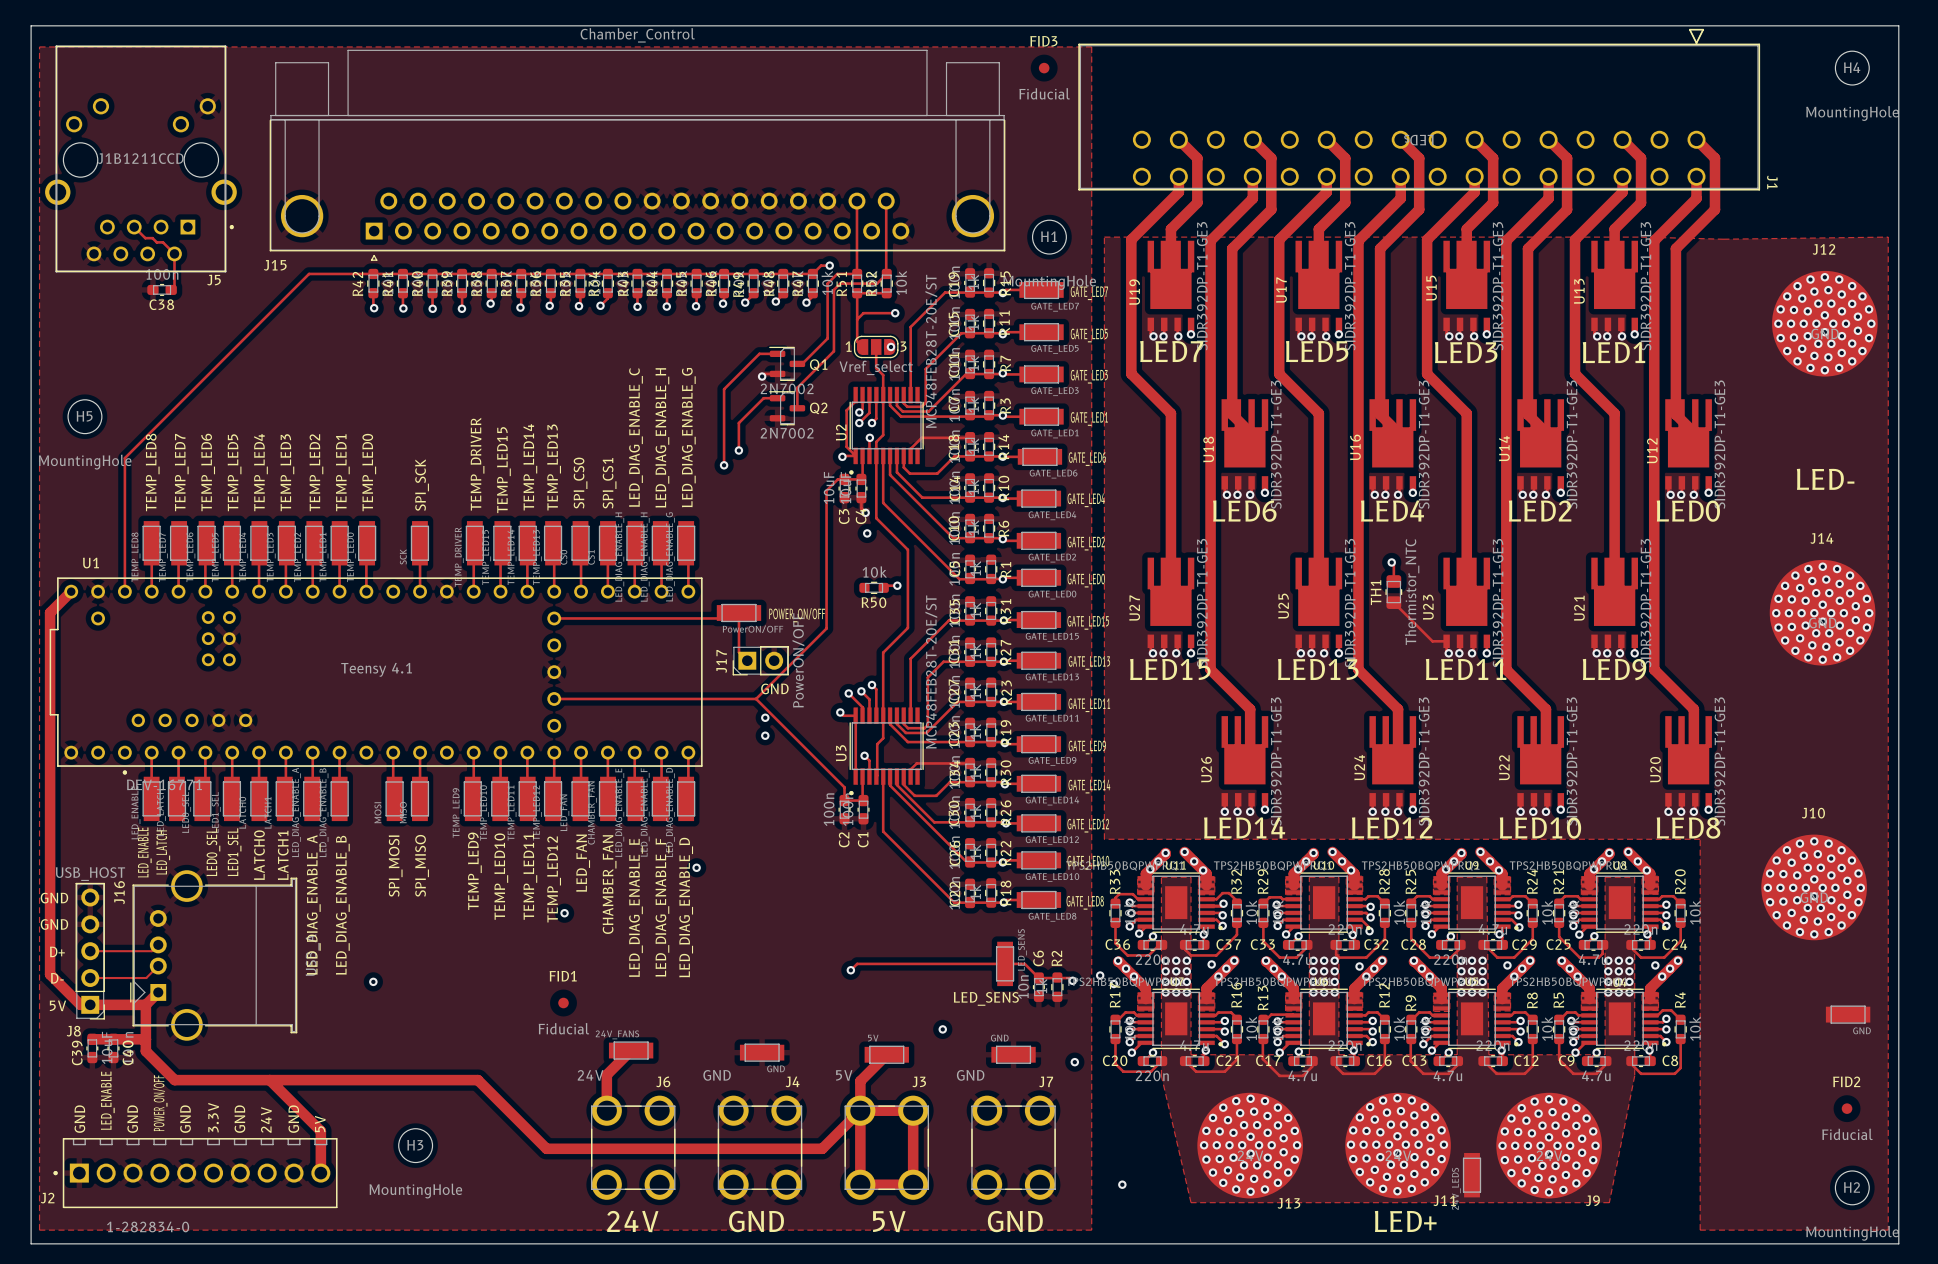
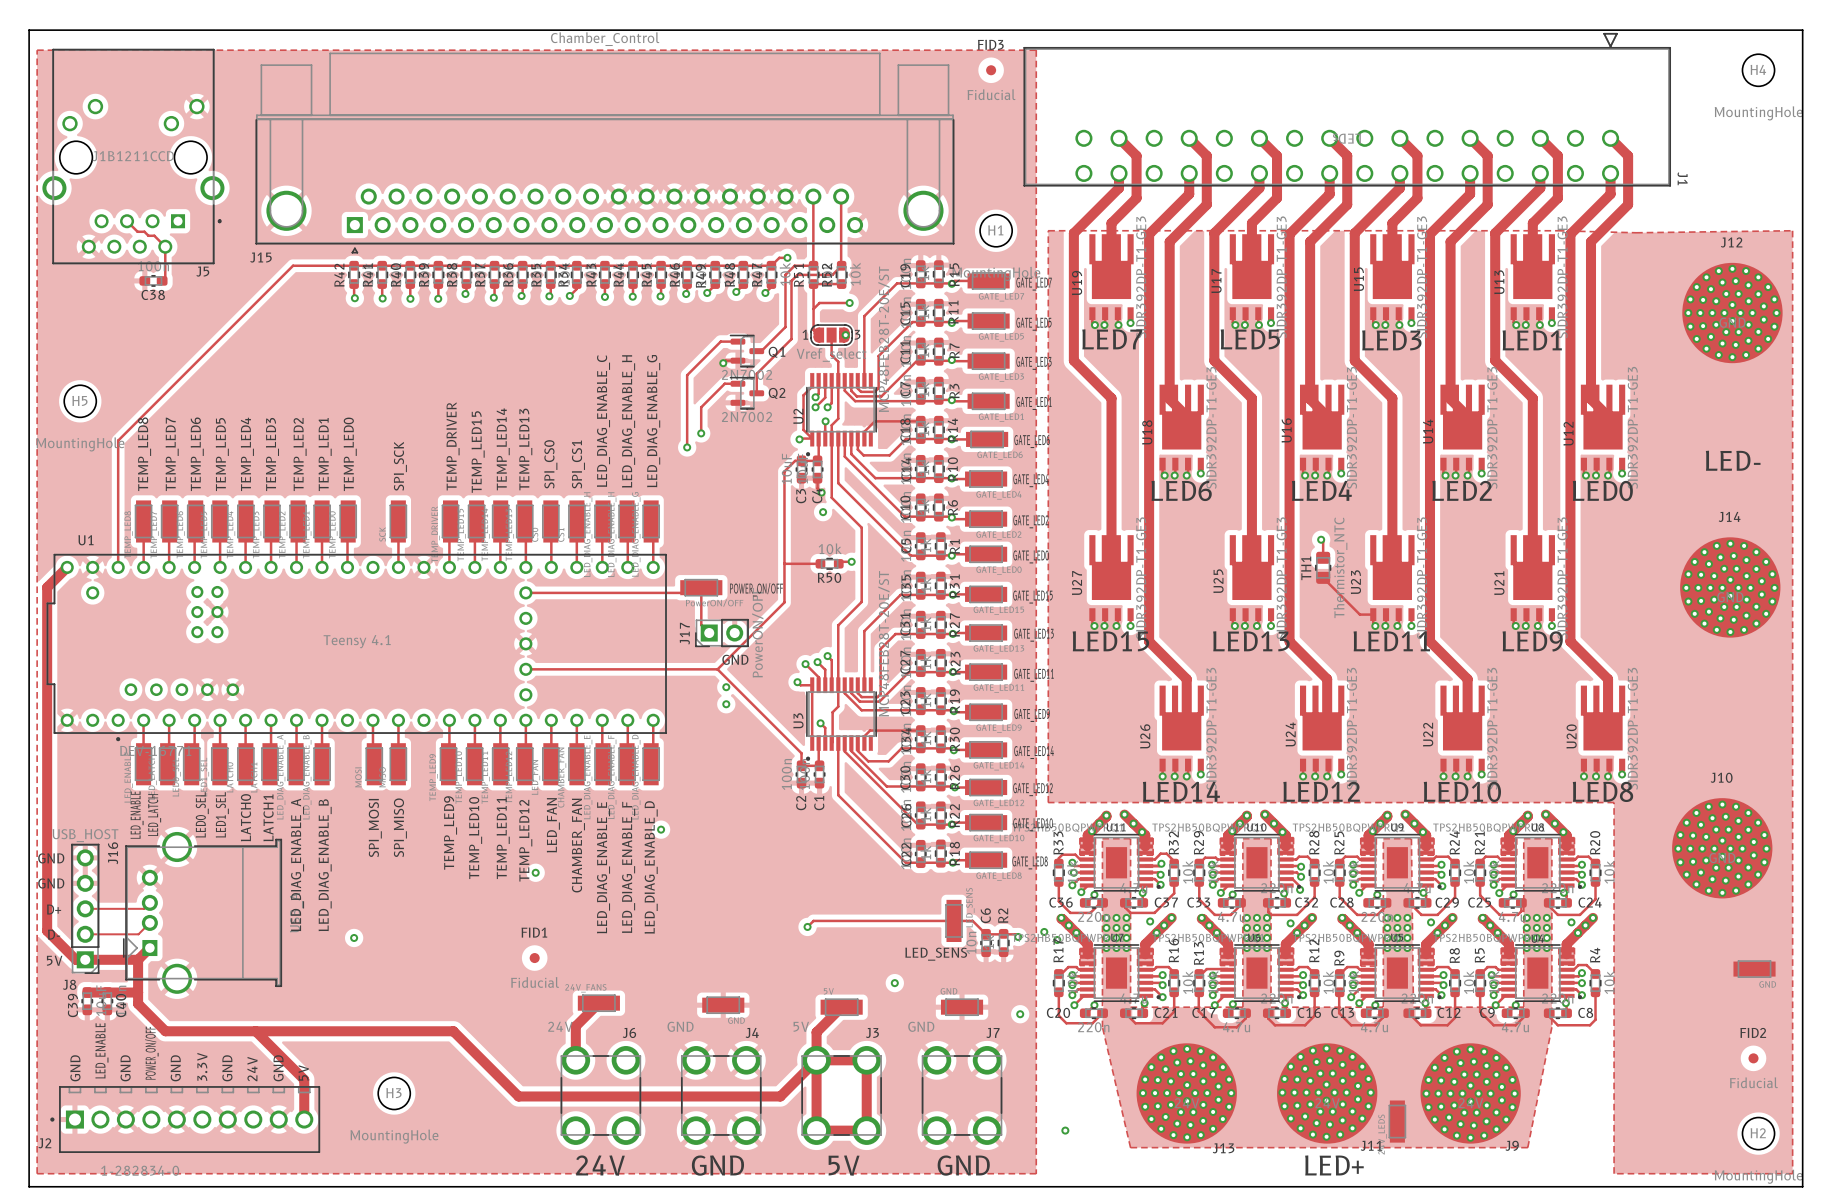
track: none -> (784, 563) (820, 563)

